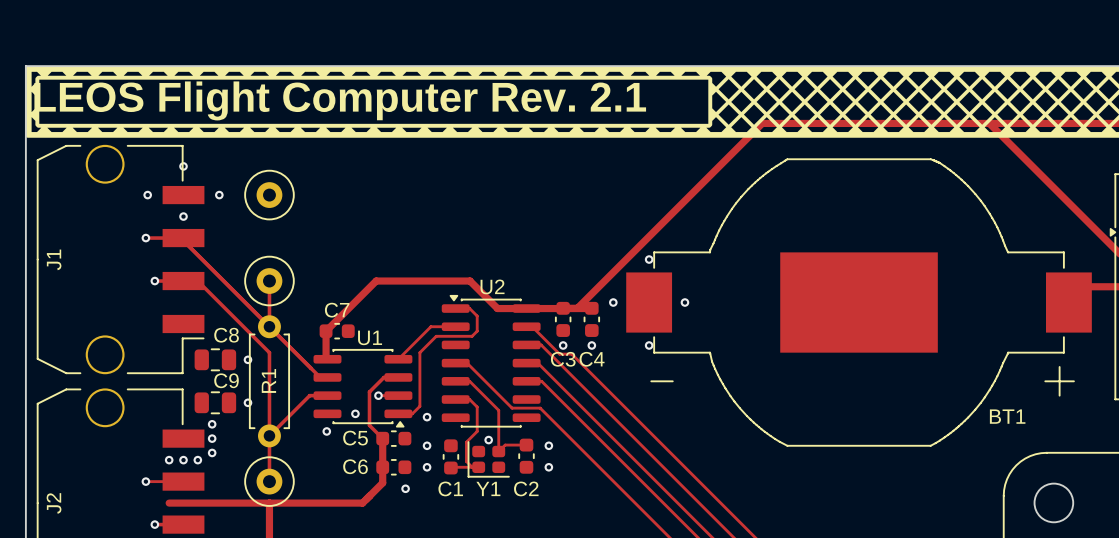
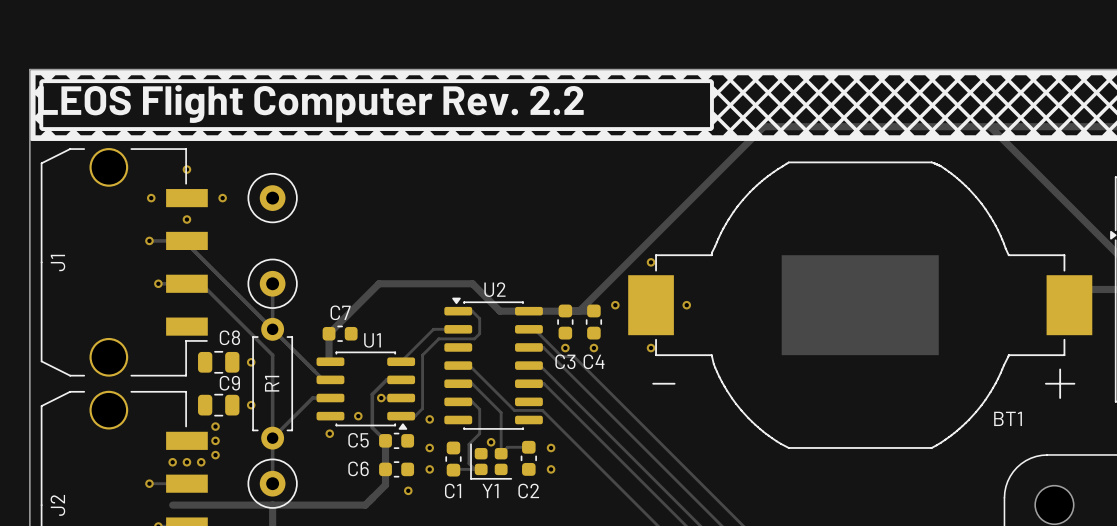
text: LEOS Flight Computer Rev. 2.1 (340, 100) -> LEOS Flight Computer Rev. 2.2 (310, 104)

